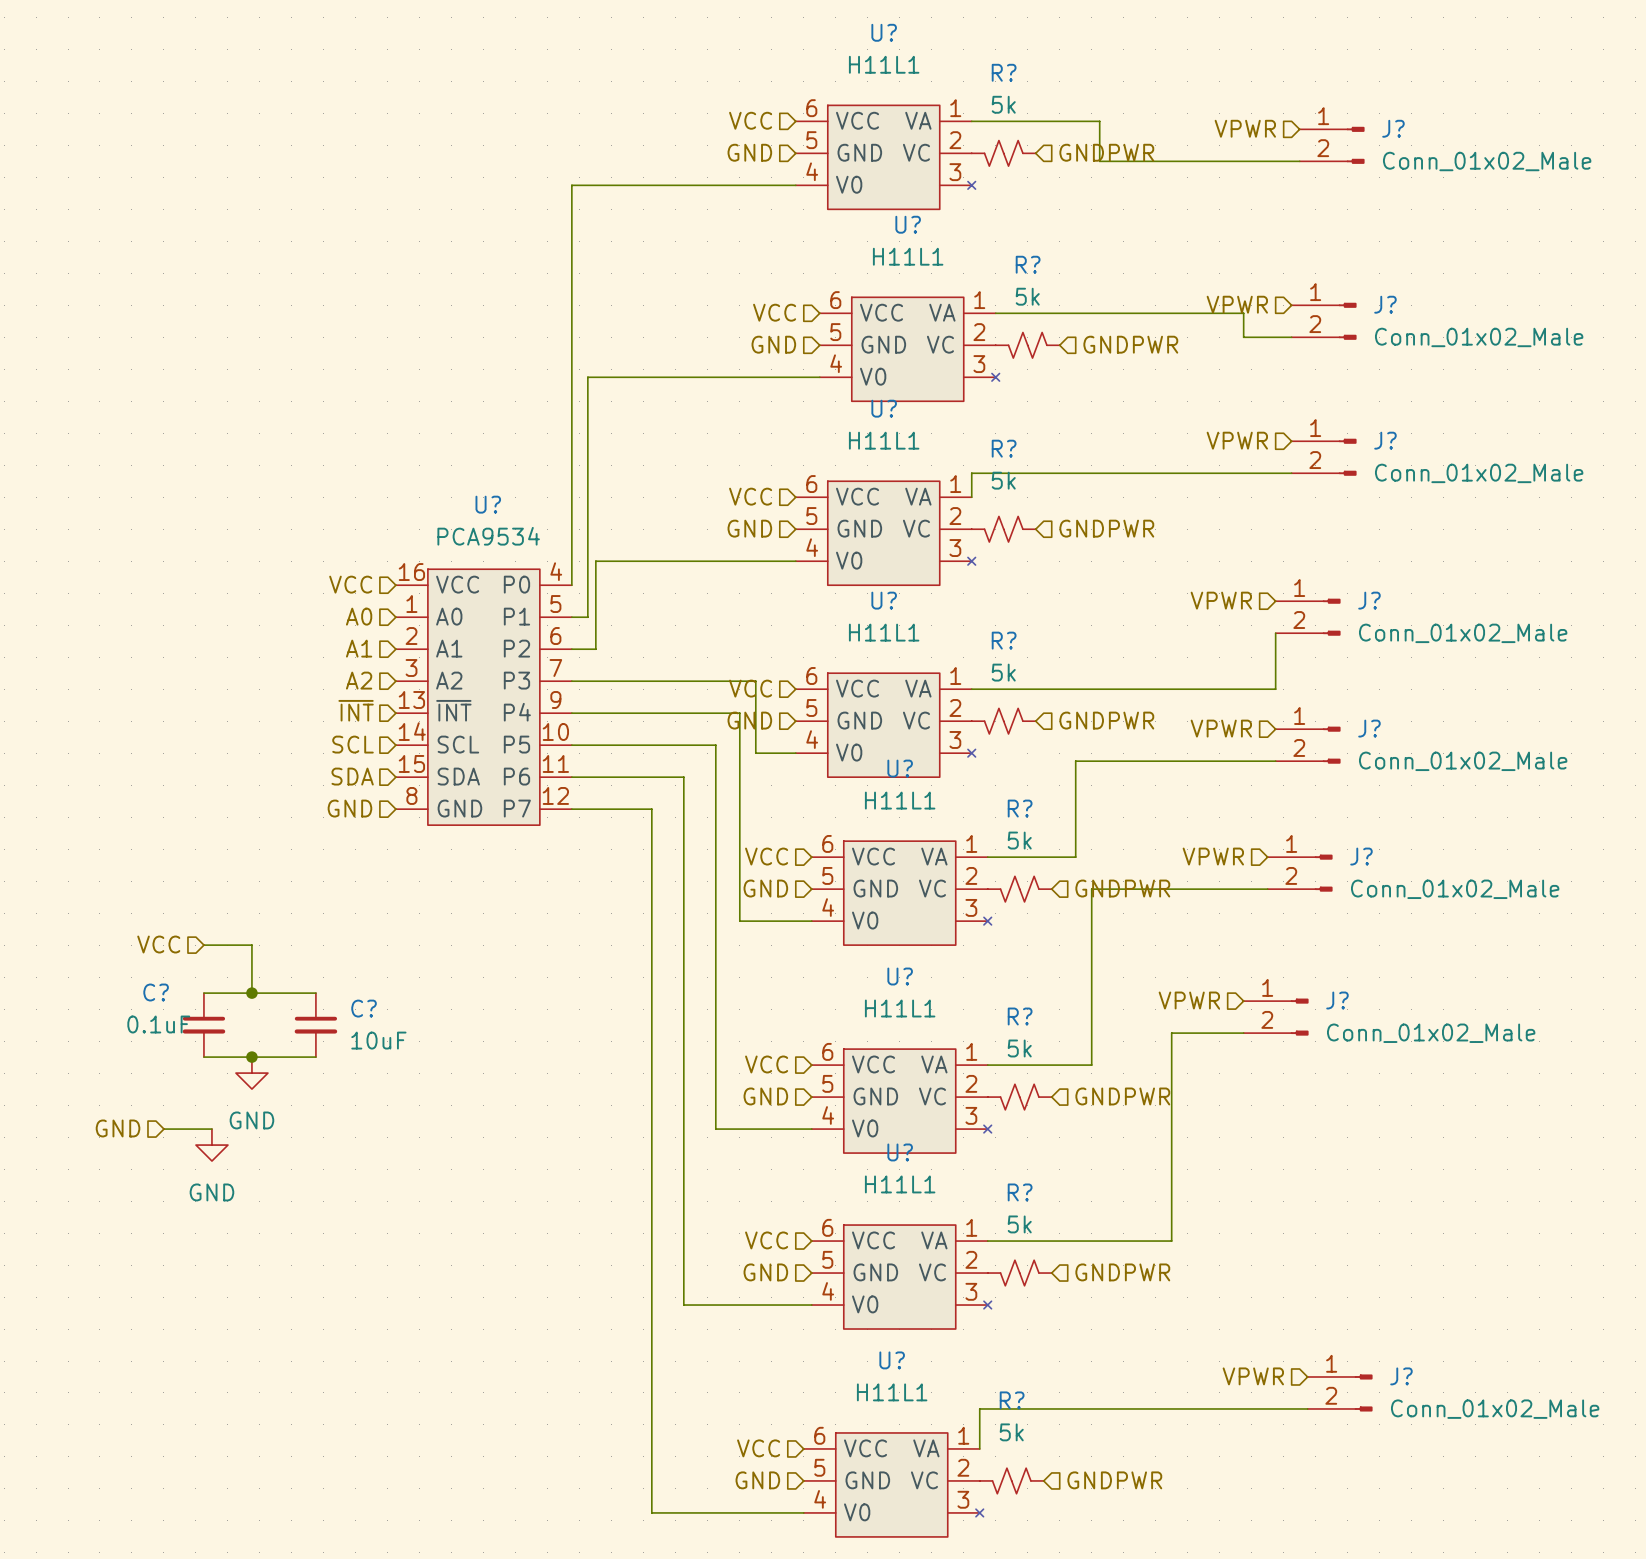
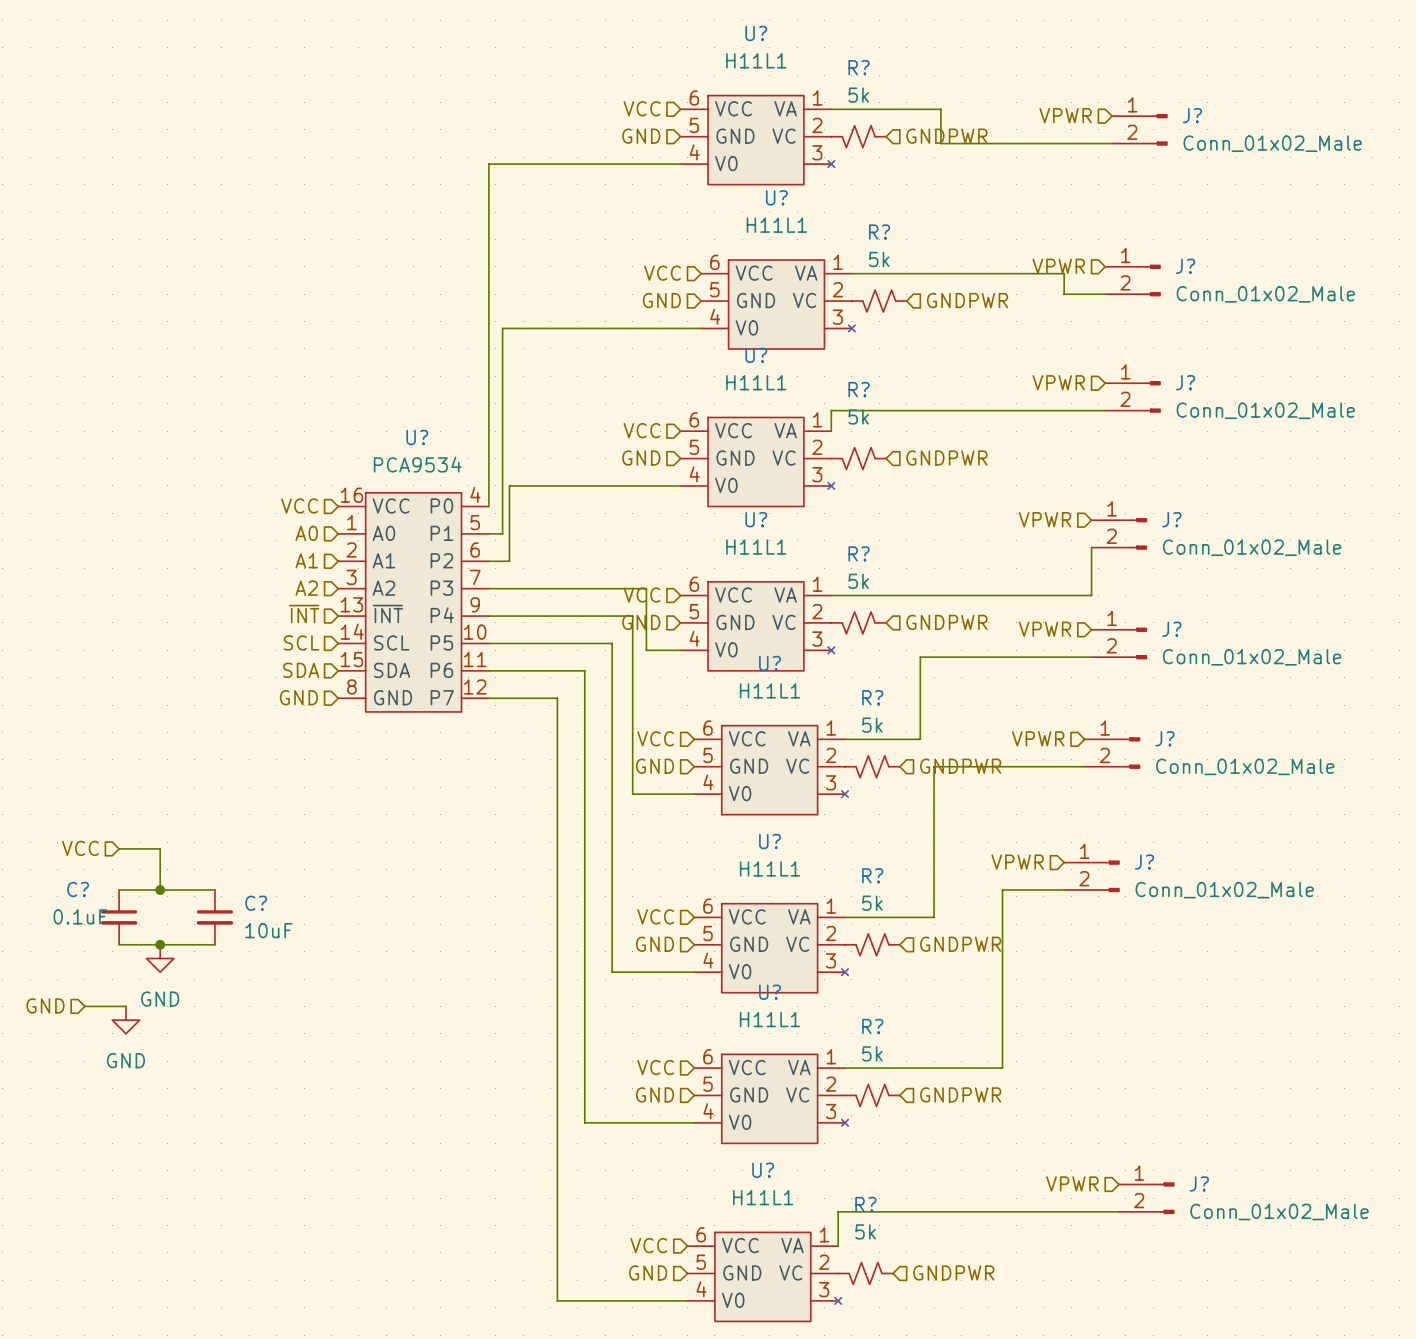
hierarchical label position: VCC (158, 944) -> VCC (80, 848)
wire: (203, 945) (251, 945) (251, 993) -> (119, 848) (160, 848) (160, 890)
wire: (203, 993) (315, 993) -> (119, 890) (214, 890)
junction: (251, 993) -> none
C? position: (203, 1025) -> (119, 917)
C? position: (315, 1025) -> (214, 917)
junction: none -> (160, 890)
wire: (203, 1057) (315, 1057) -> (119, 944) (214, 944)
junction: (251, 1057) -> none
power symbol: GND (251, 1073) -> none
junction: none -> (160, 944)
power symbol: none -> GND (160, 958)
hierarchical label position: GND (118, 1128) -> GND (45, 1005)
wire: (163, 1129) (211, 1129) -> (84, 1006) (125, 1006)
power symbol: GND (211, 1145) -> none
power symbol: none -> GND (125, 1020)

